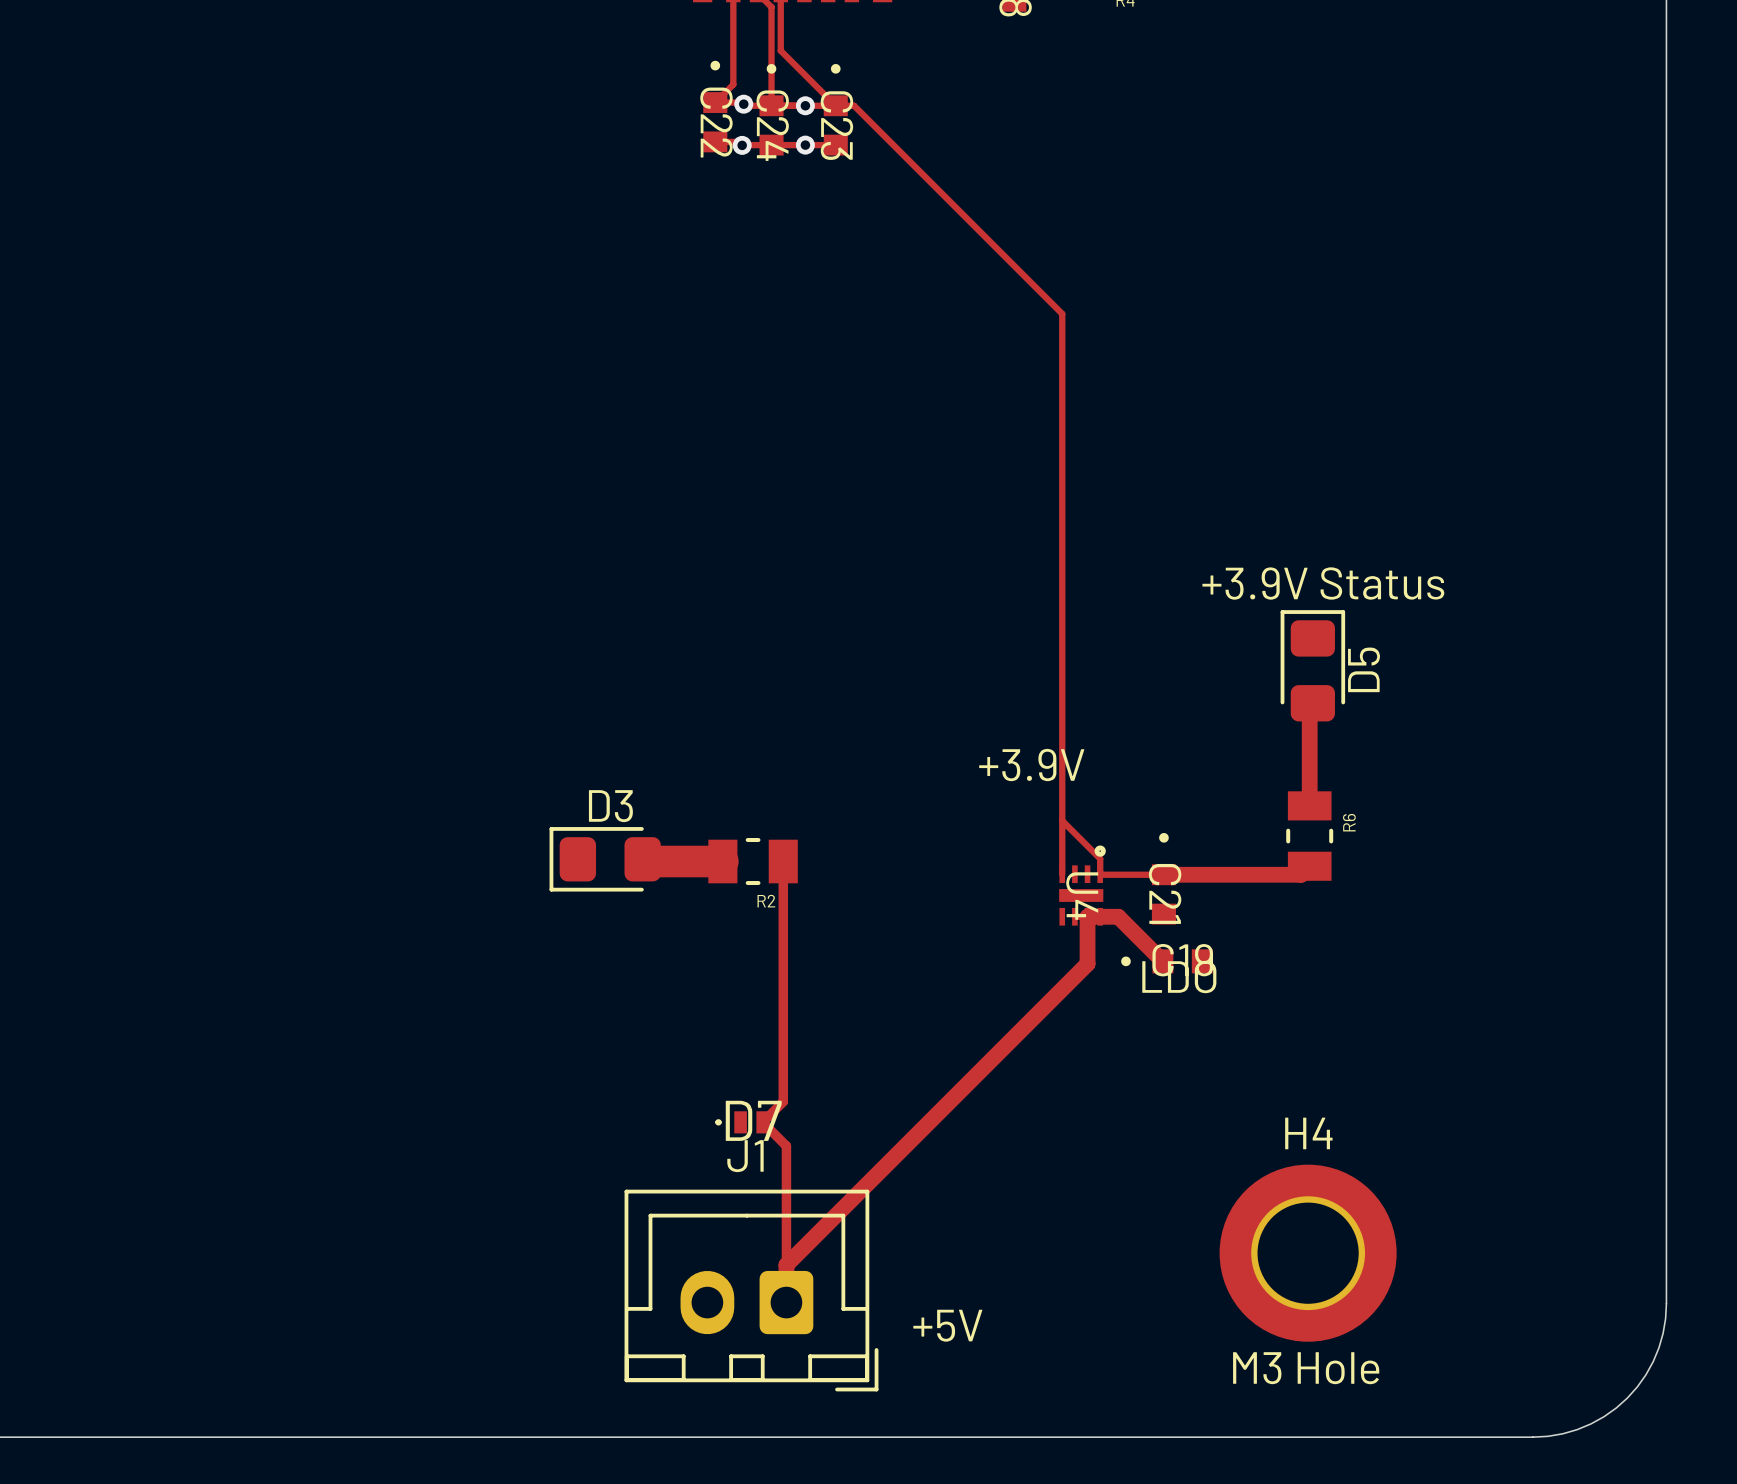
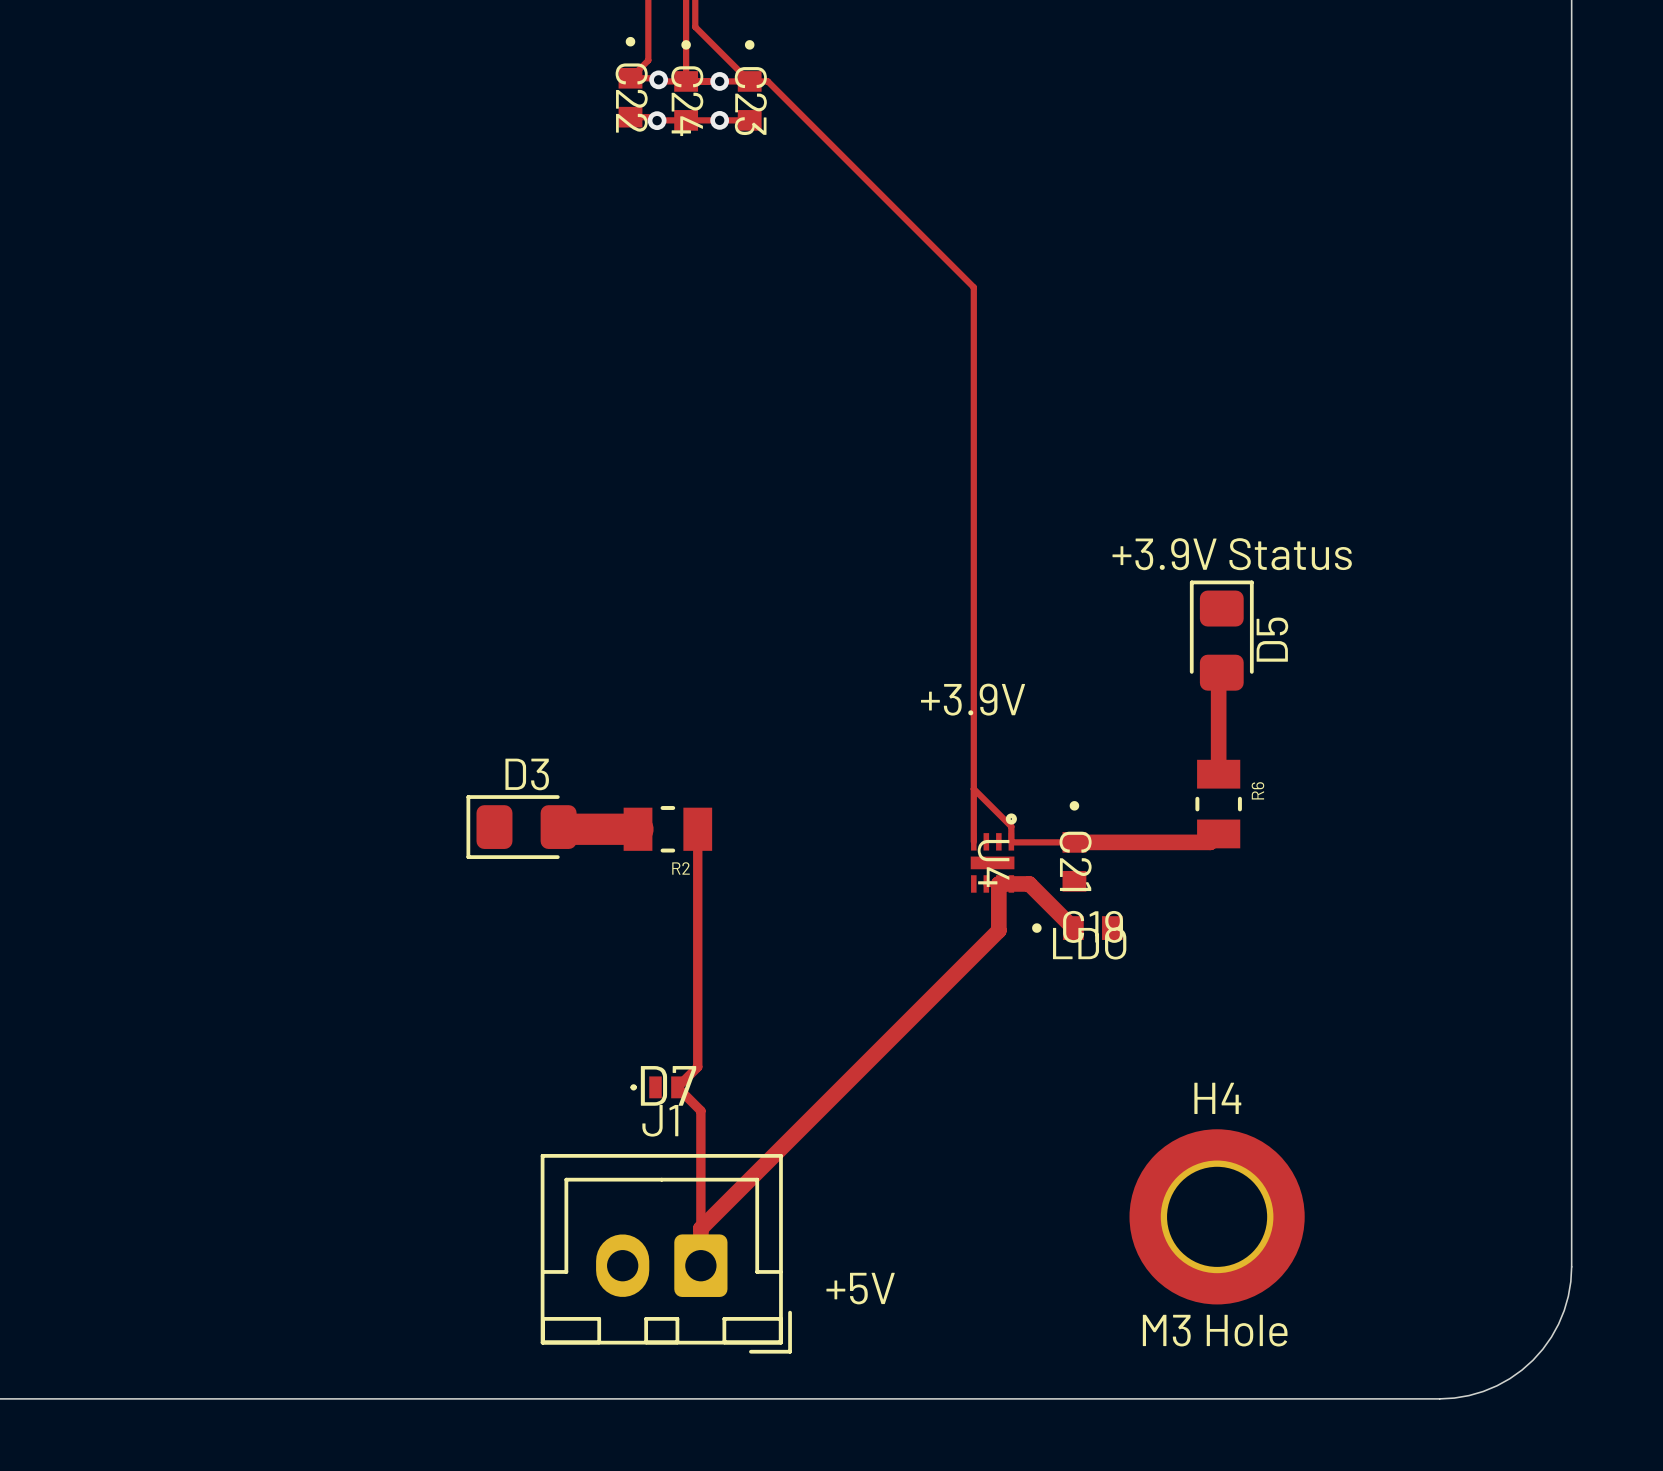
text position: +3.9V (1031, 765) -> +3.9V (973, 699)

